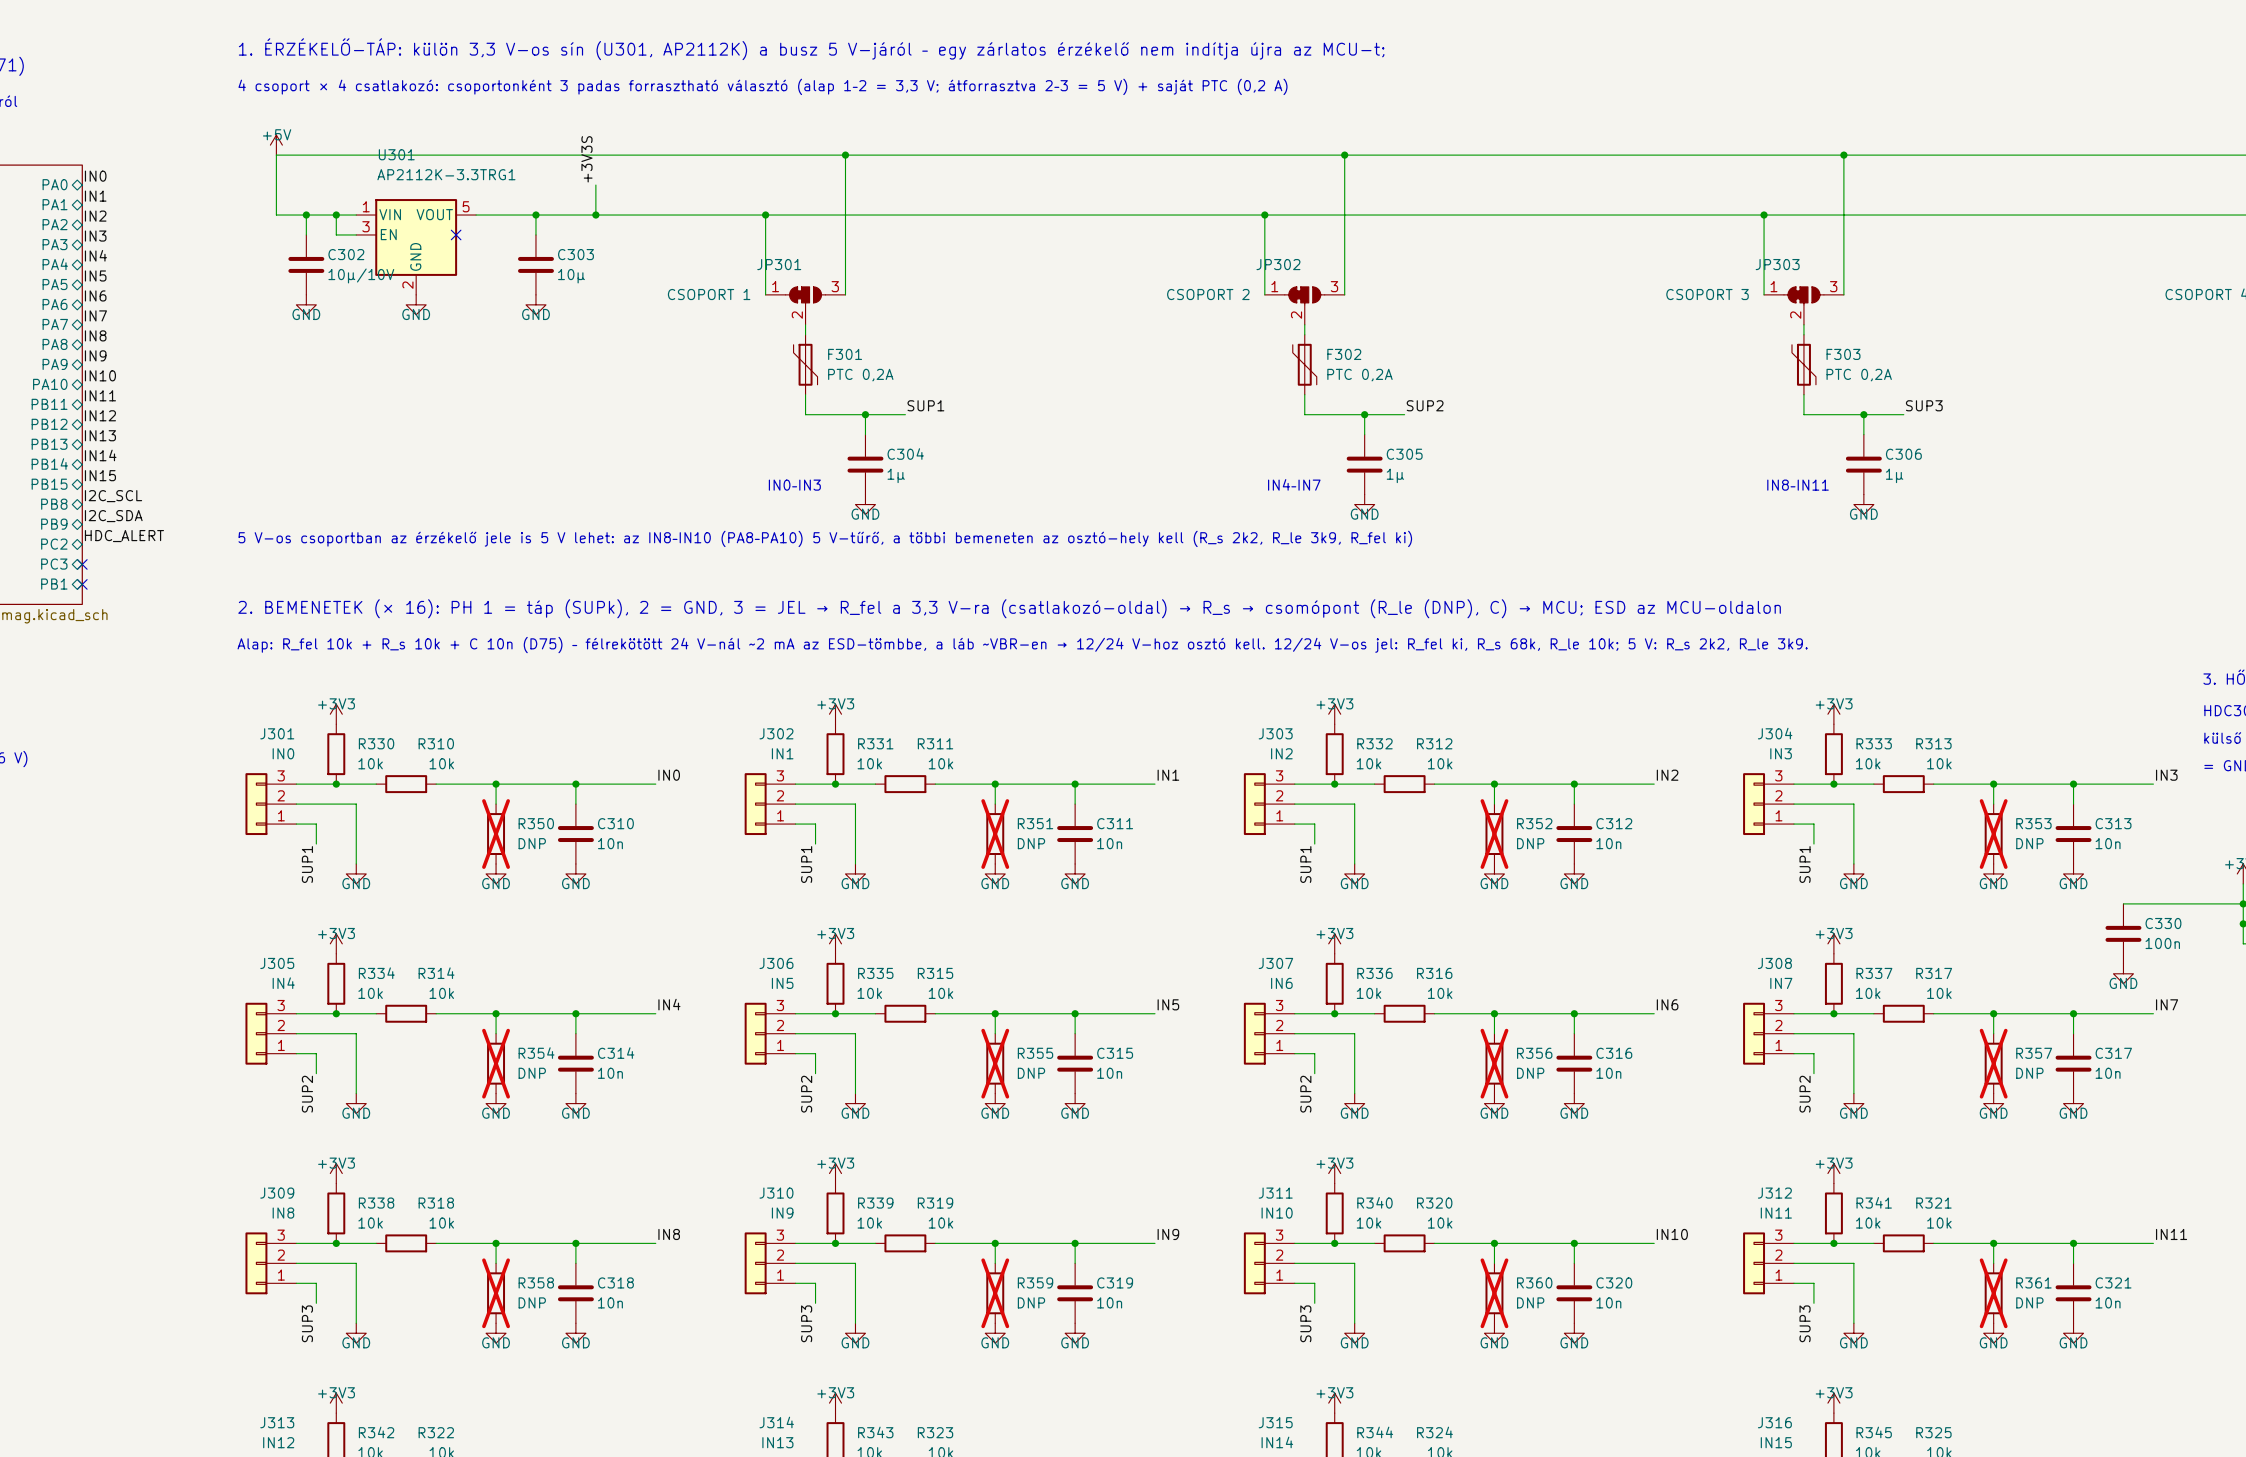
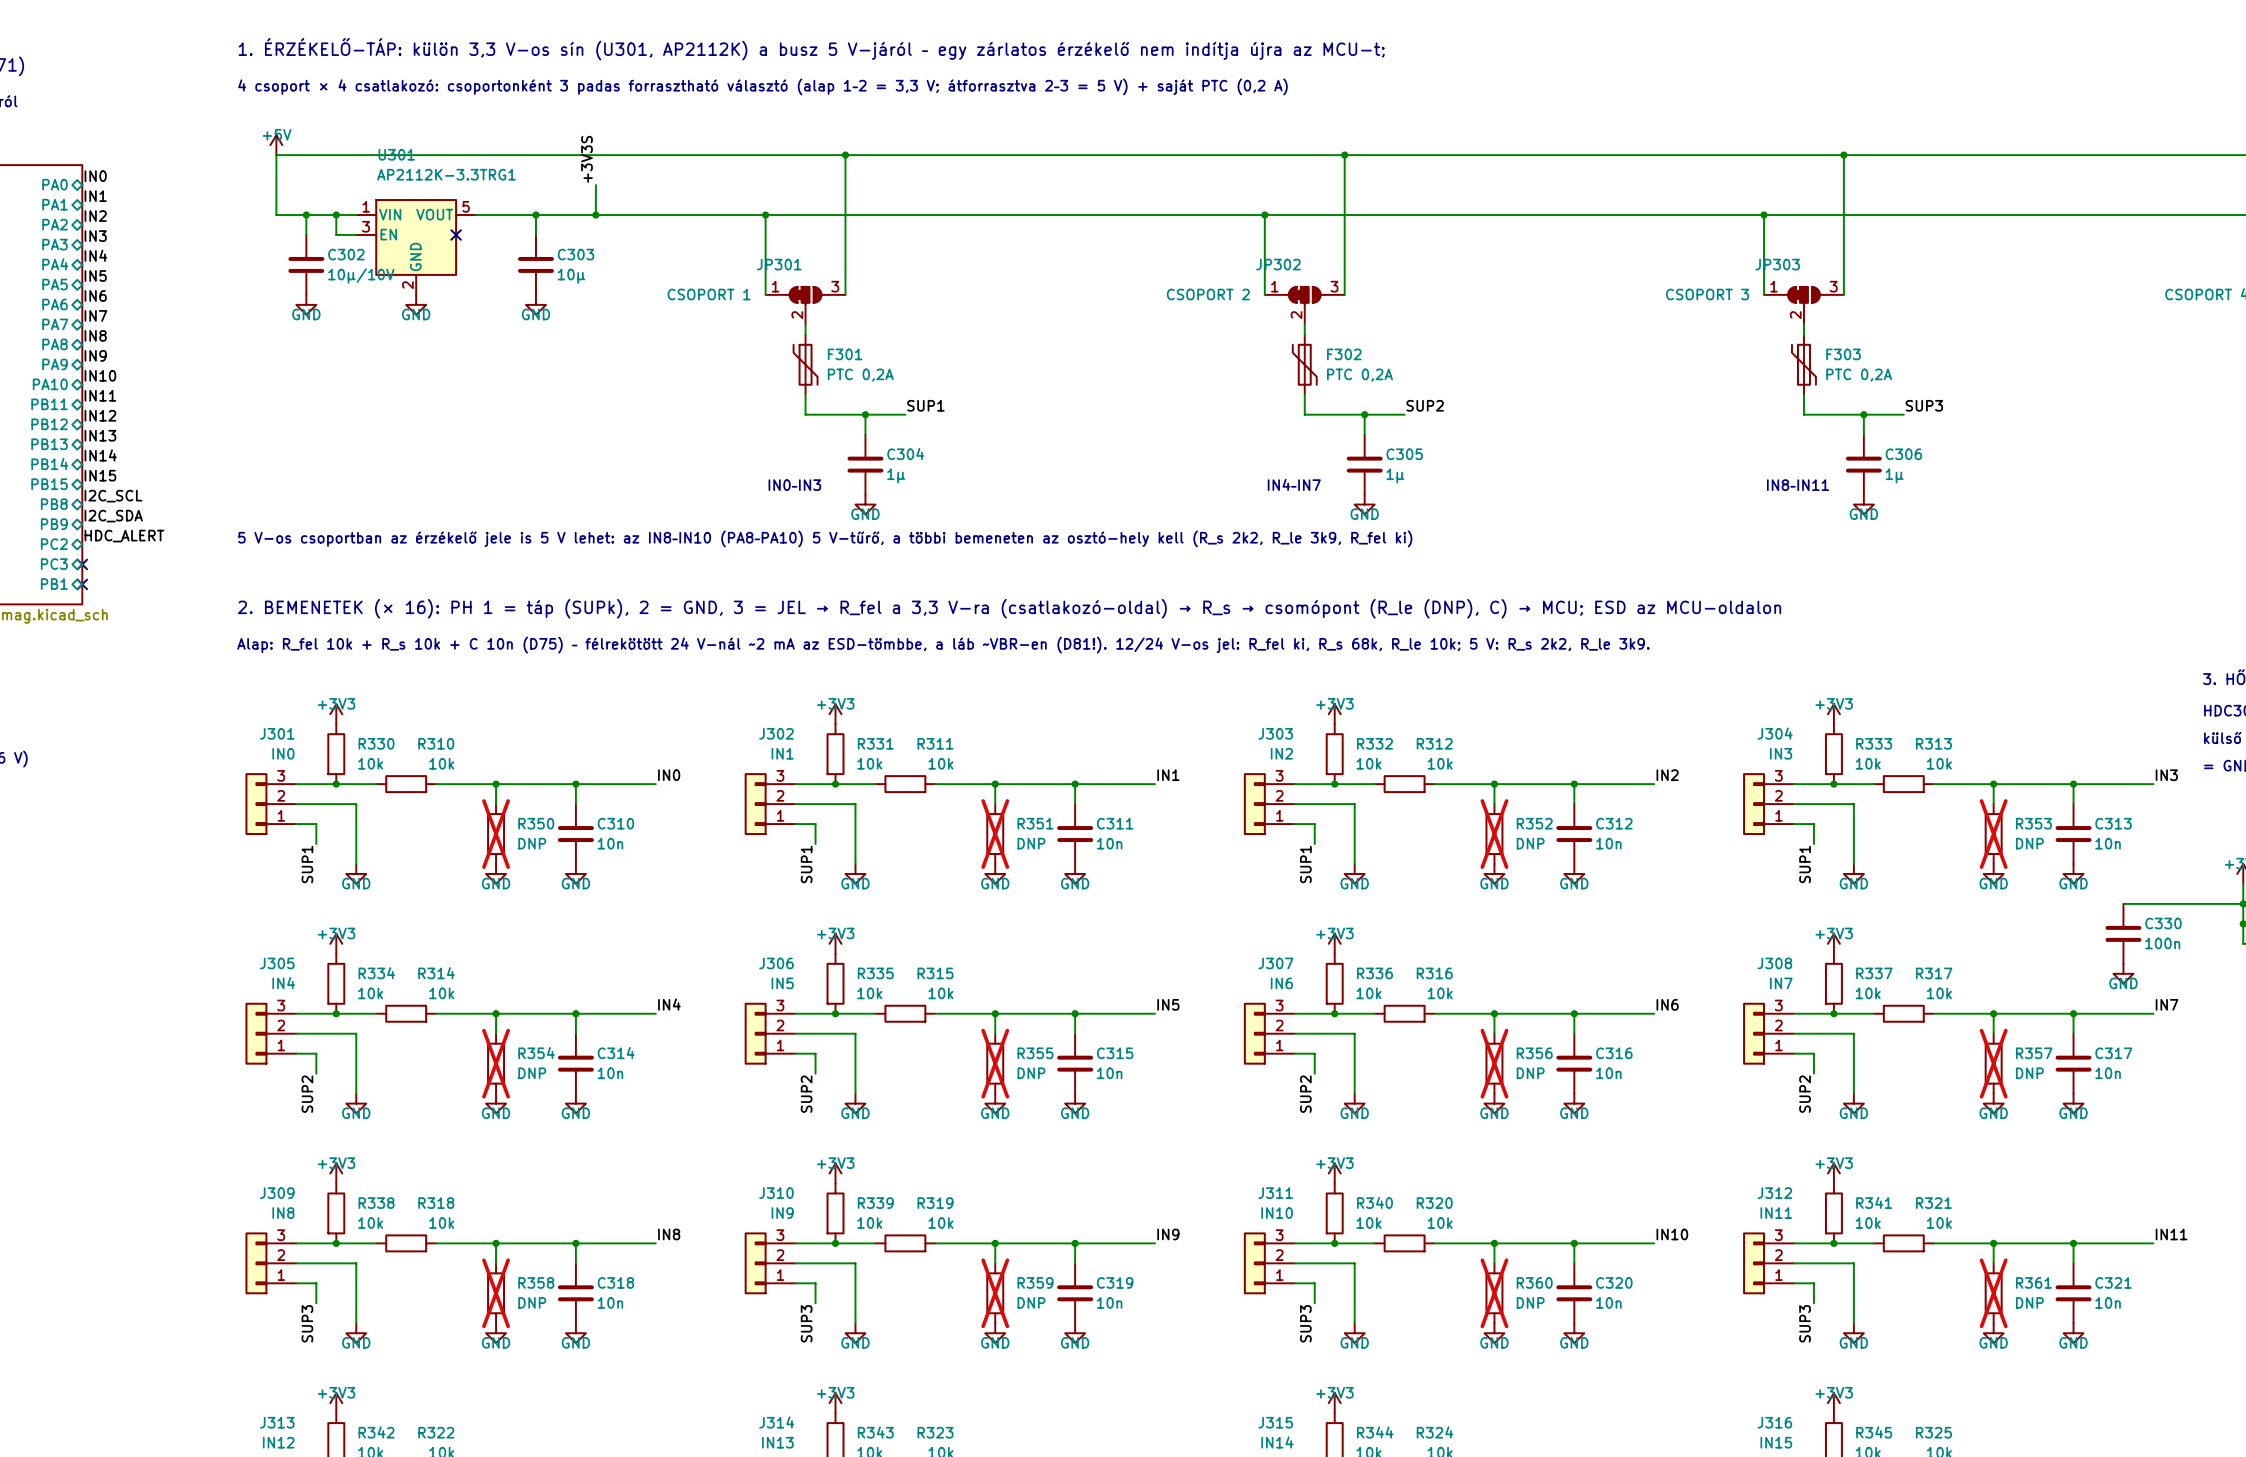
text: Alap: R_fel 10k + R_s 10k + C 10n (D75) – félrekötött 24 V-nál ~2 mA az ESD-tömbbe, a láb ~VBR-en → 12/24 V-hoz osztó kell. 12/24 V-os jel: R_fel ki, R_s 68k, R_le 10k; 5 V: R_s 2k2, R_le 3k9. (1022, 645) -> Alap: R_fel 10k + R_s 10k + C 10n (D75) – félrekötött 24 V-nál ~2 mA az ESD-tömbbe, a láb ~VBR-en (D81!). 12/24 V-os jel: R_fel ki, R_s 68k, R_le 10k; 5 V: R_s 2k2, R_le 3k9. (943, 645)

